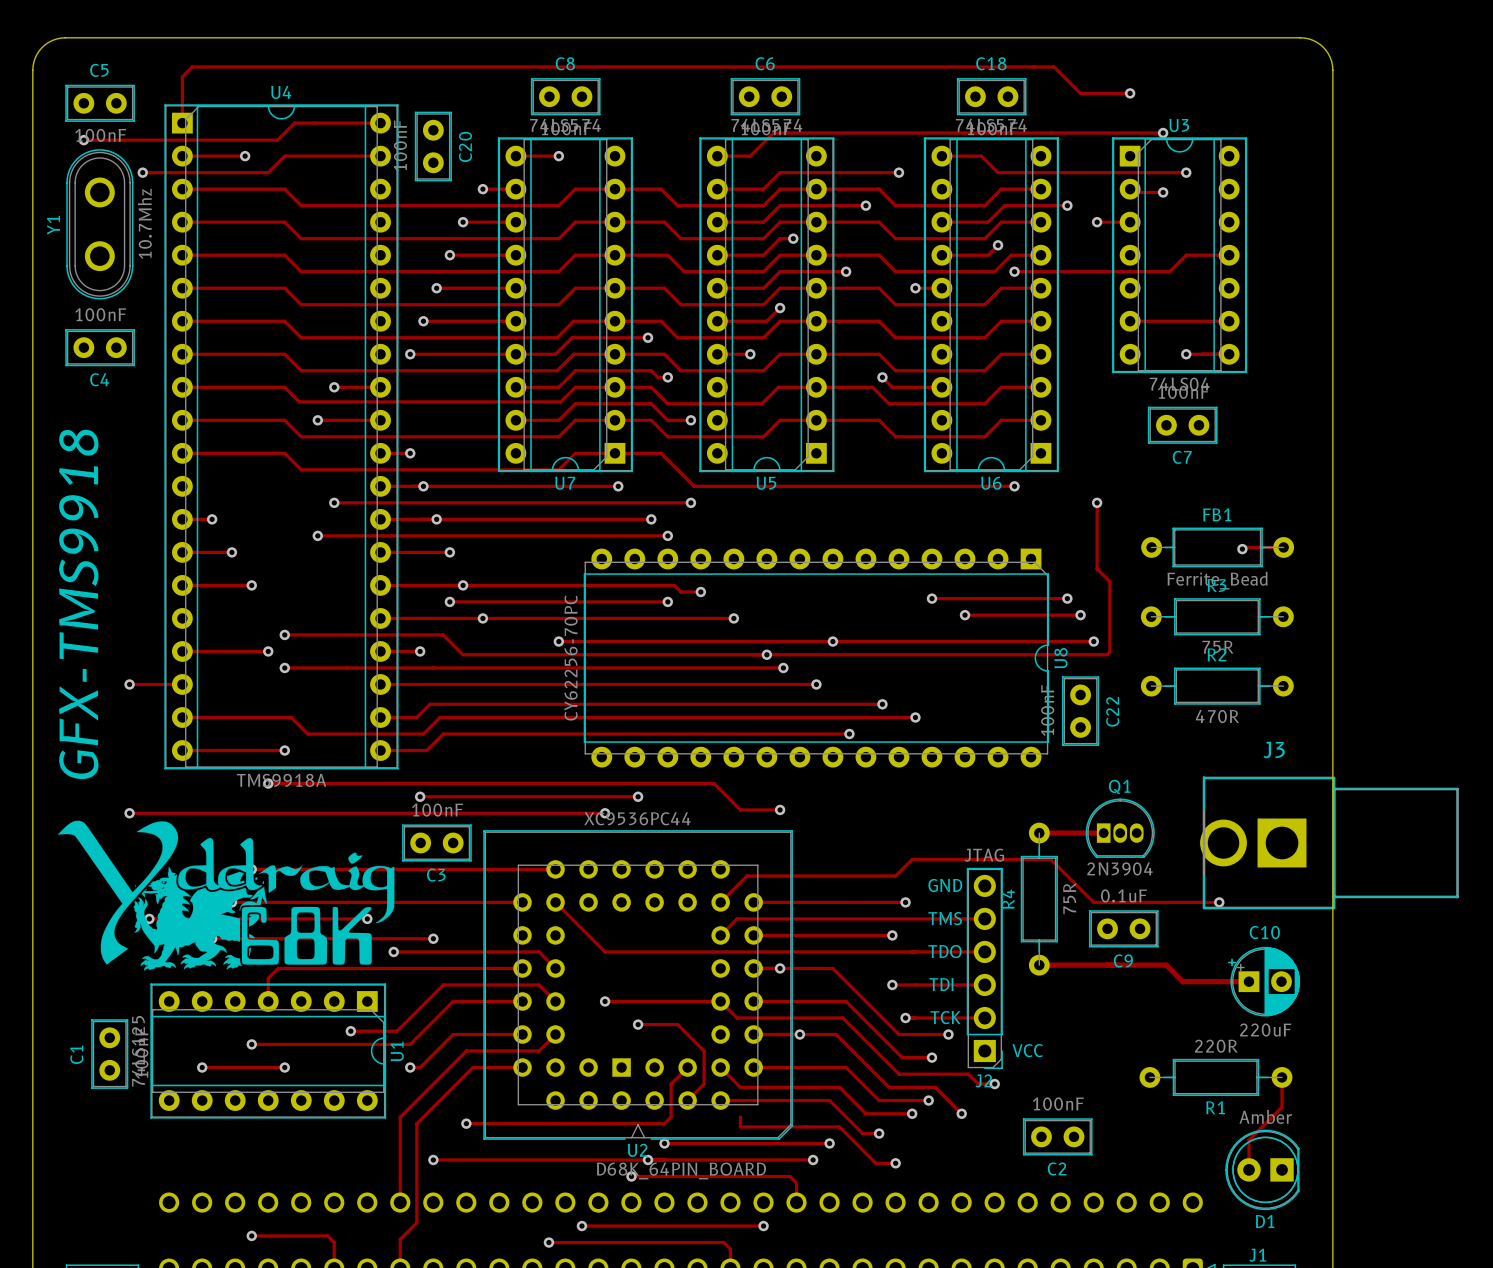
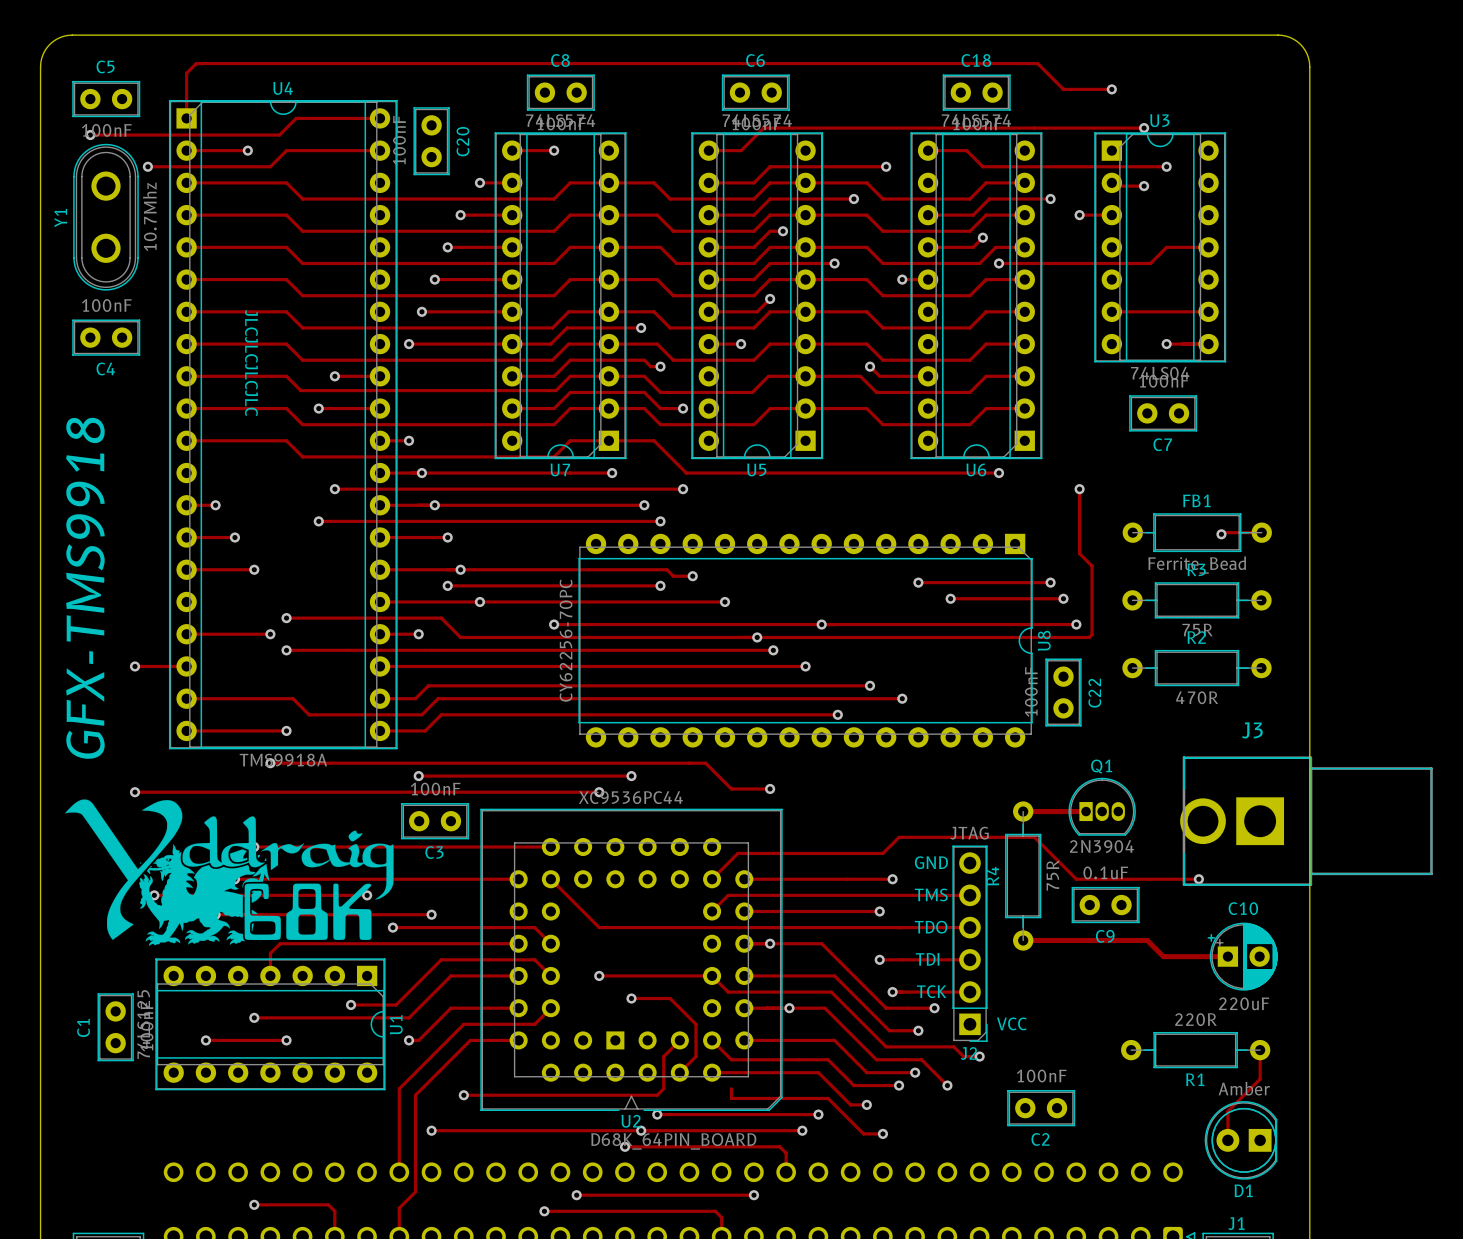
text: none -> JLCJLCJLCJLC (251, 363)

